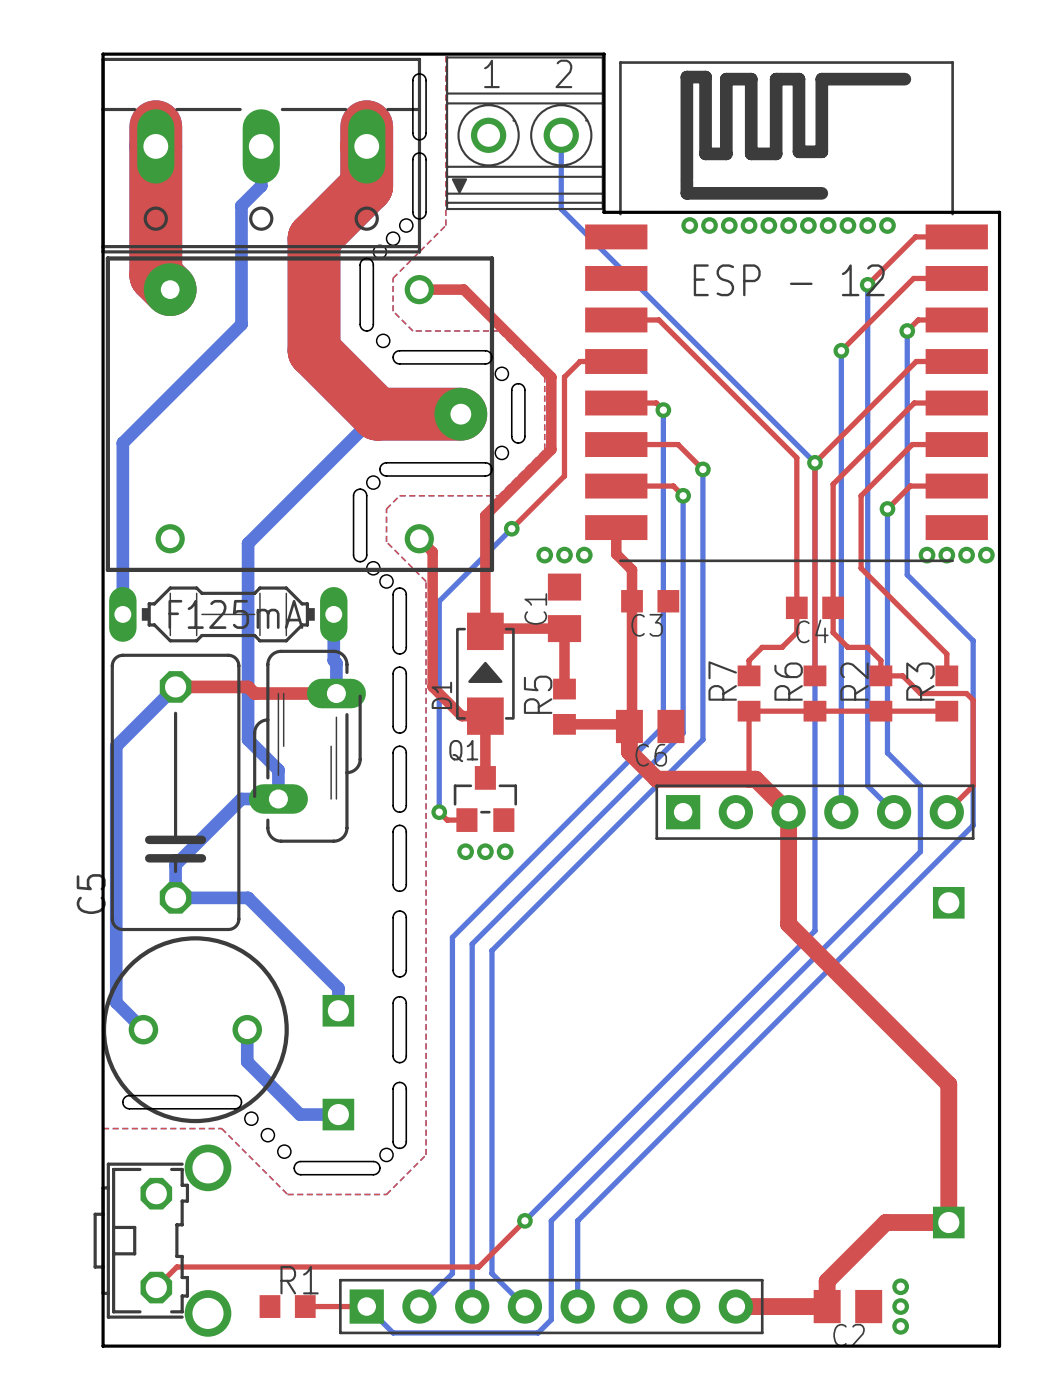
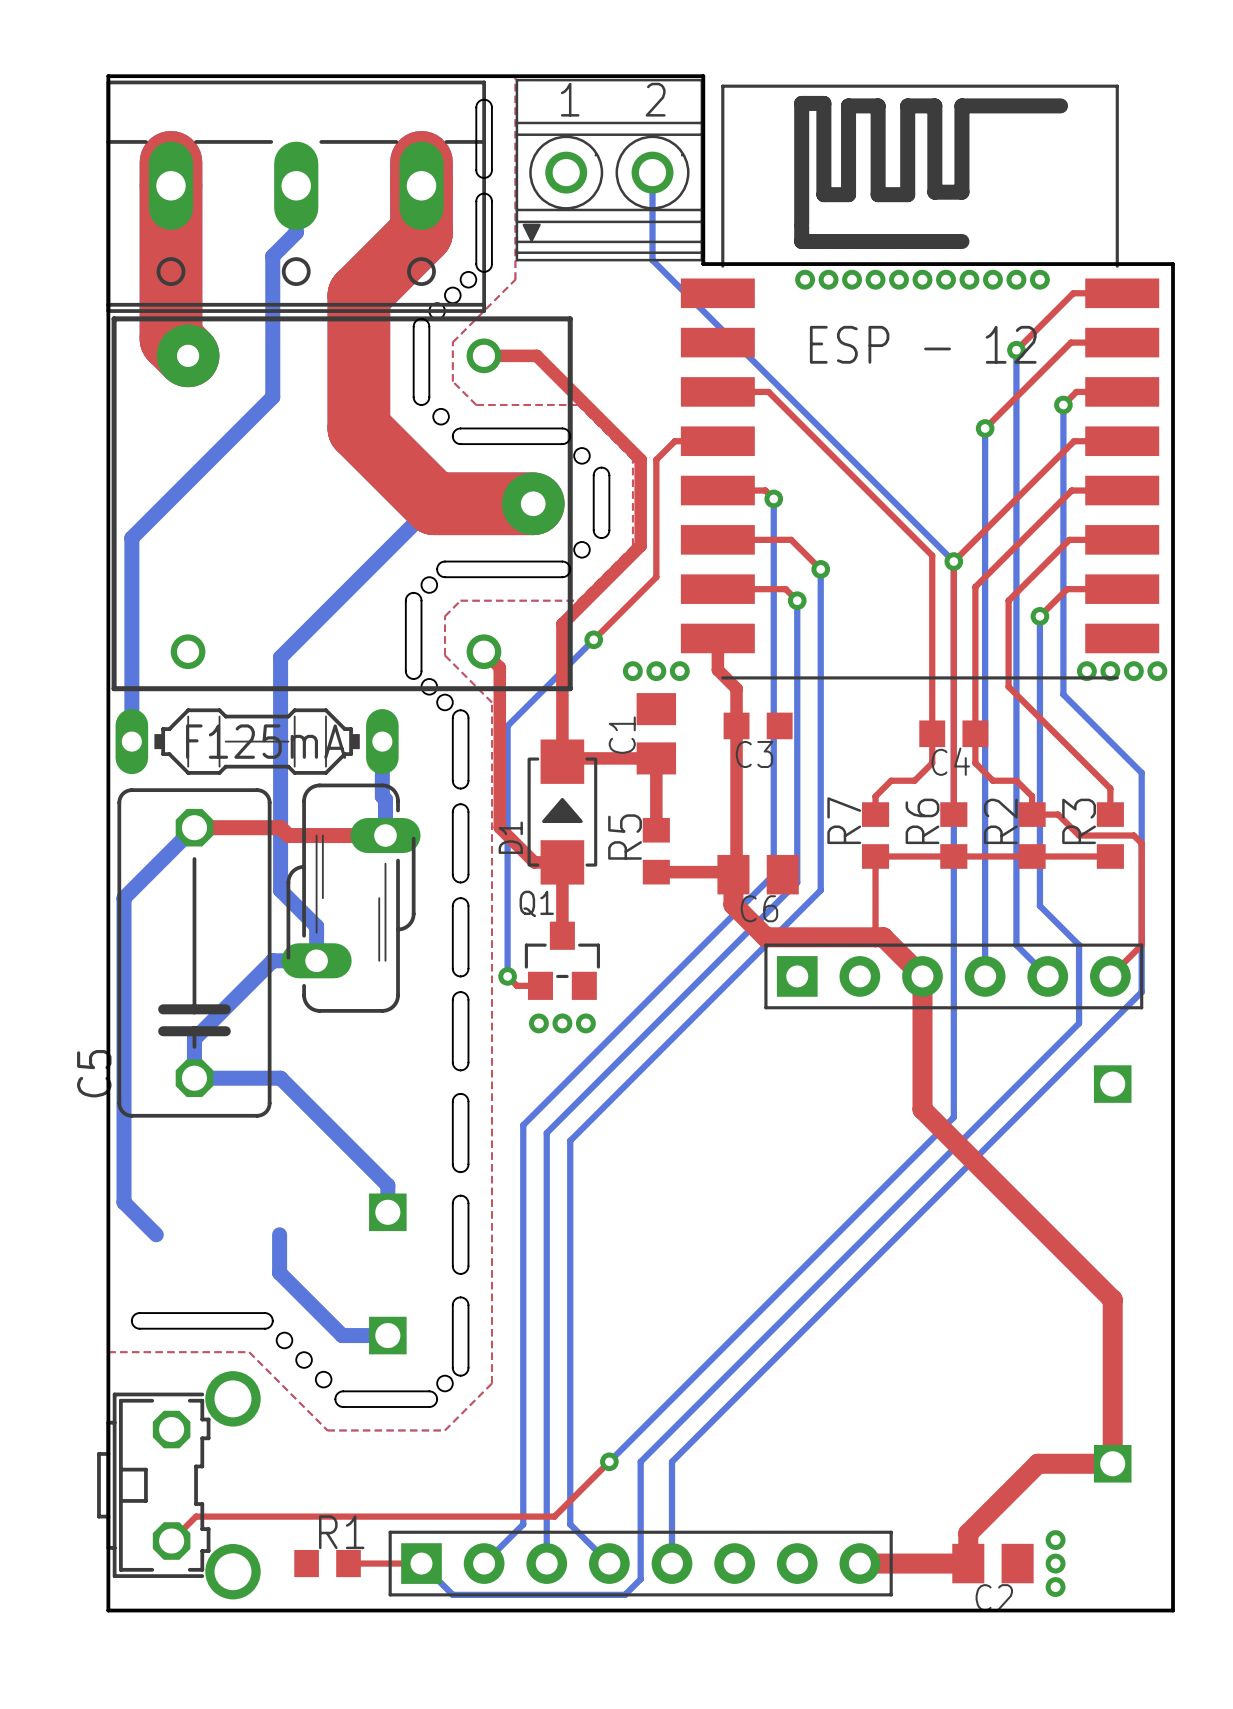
part: (195, 1029) -> none

